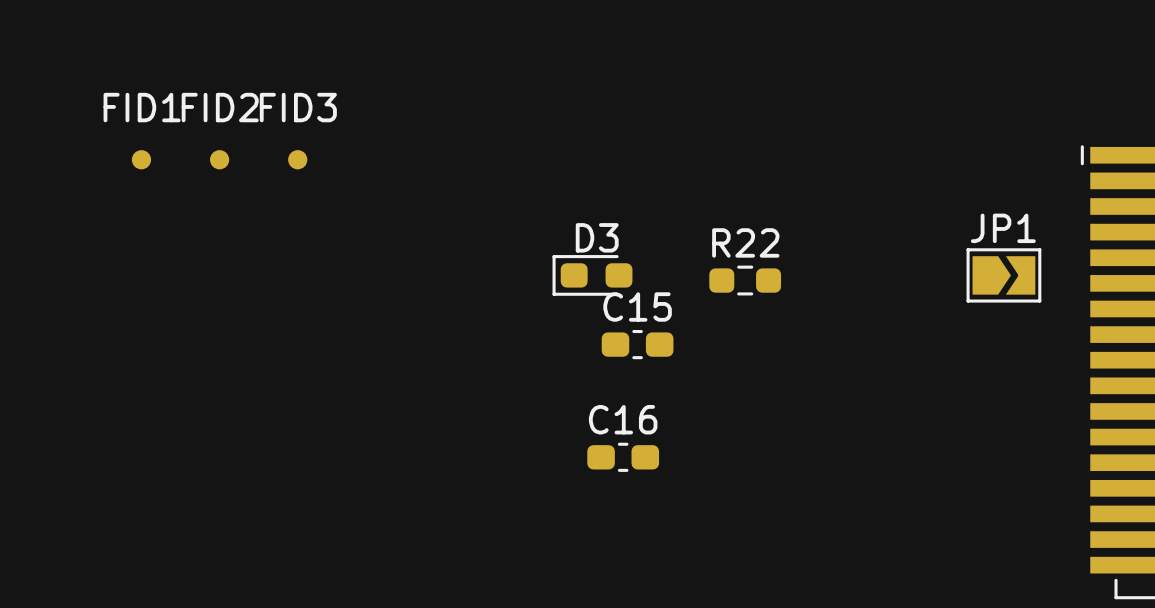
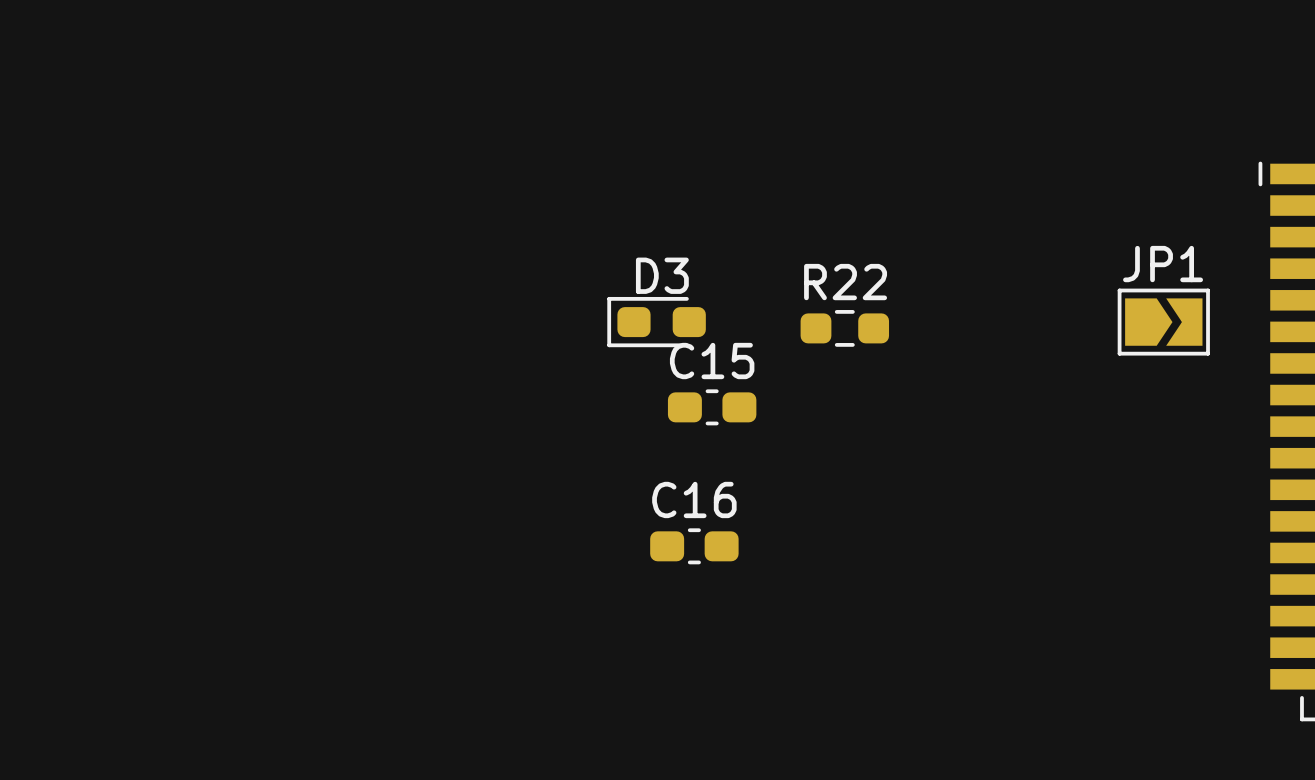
FID1: (141, 159) -> none
FID2: (219, 159) -> none
FID3: (297, 159) -> none

